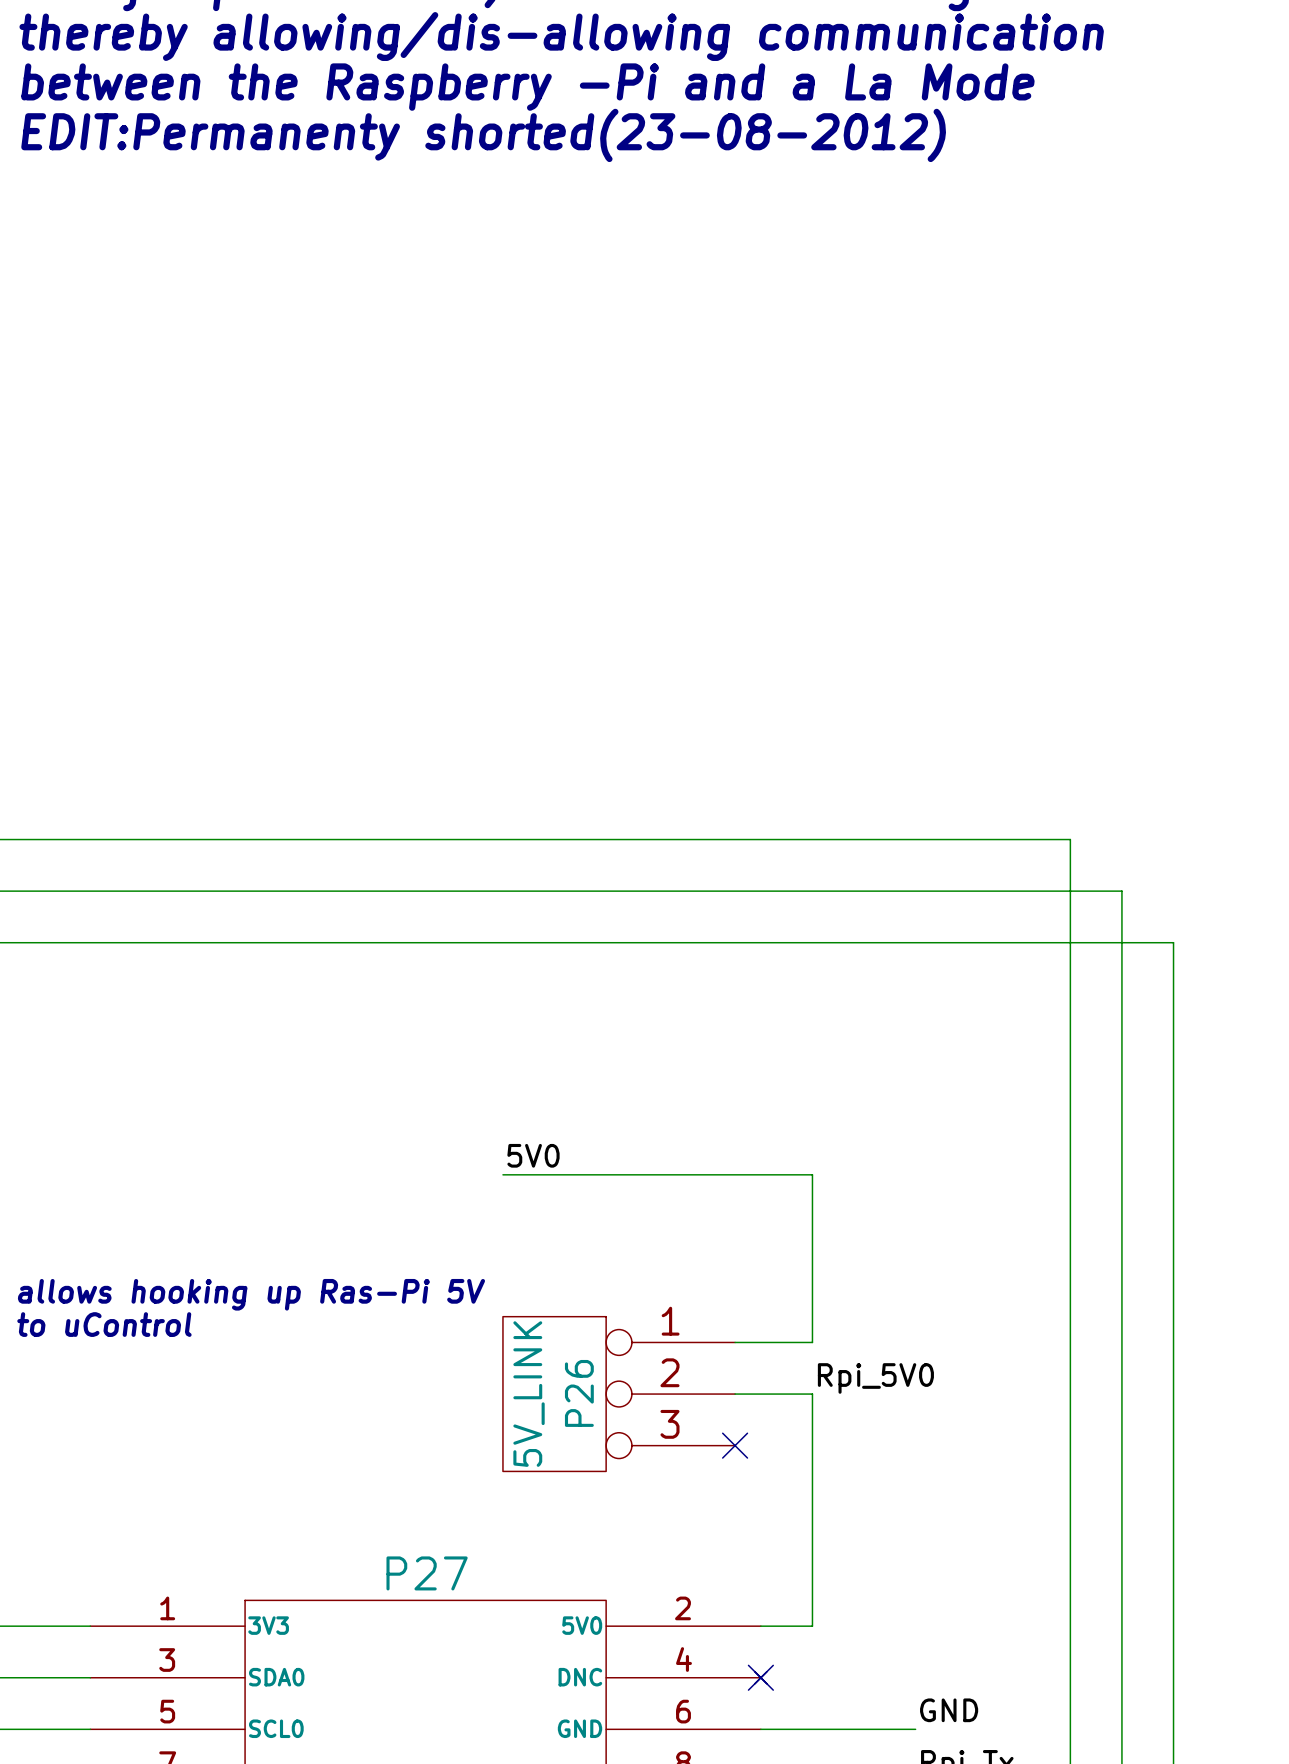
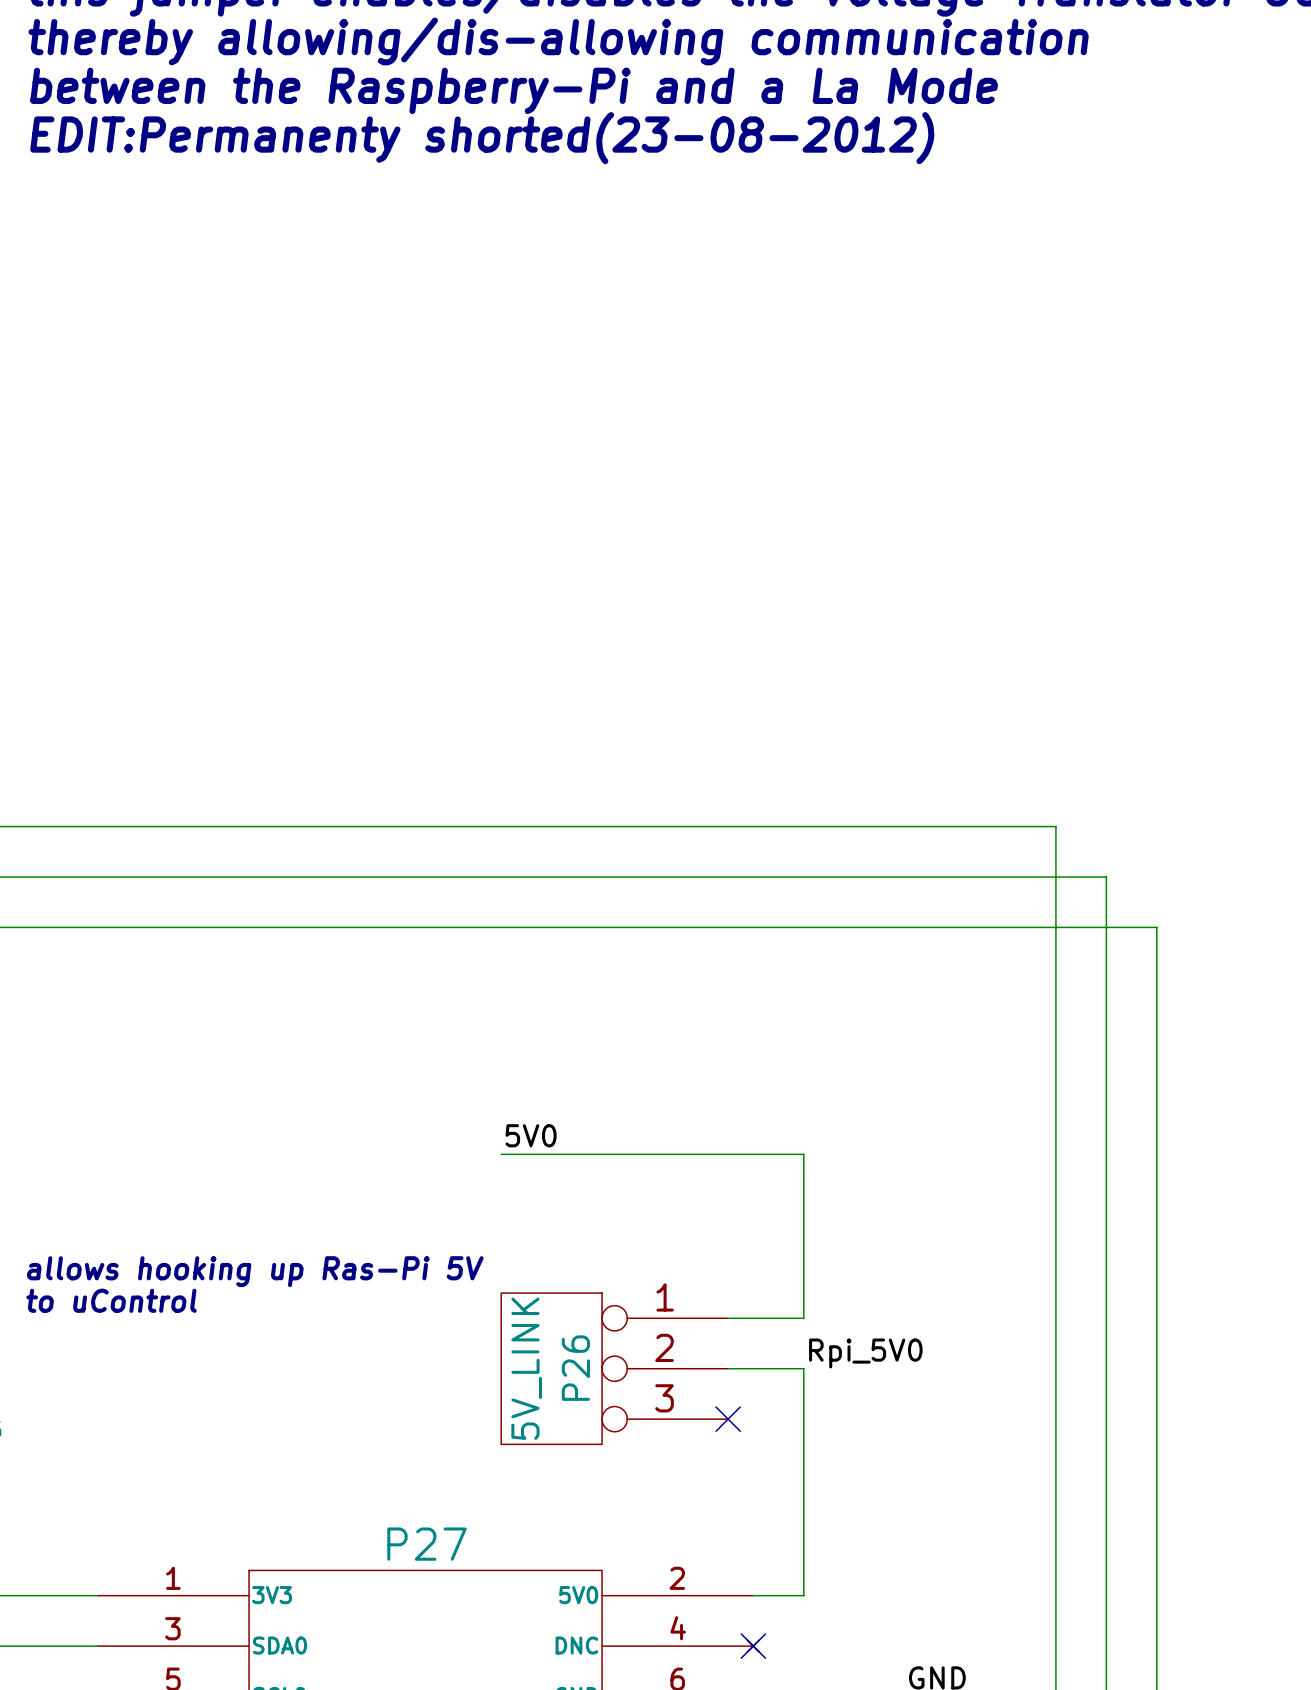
text: between the Raspberry -Pi and a La Mode (527, 87) -> between the Raspberry-Pi and a La Mode (514, 90)

